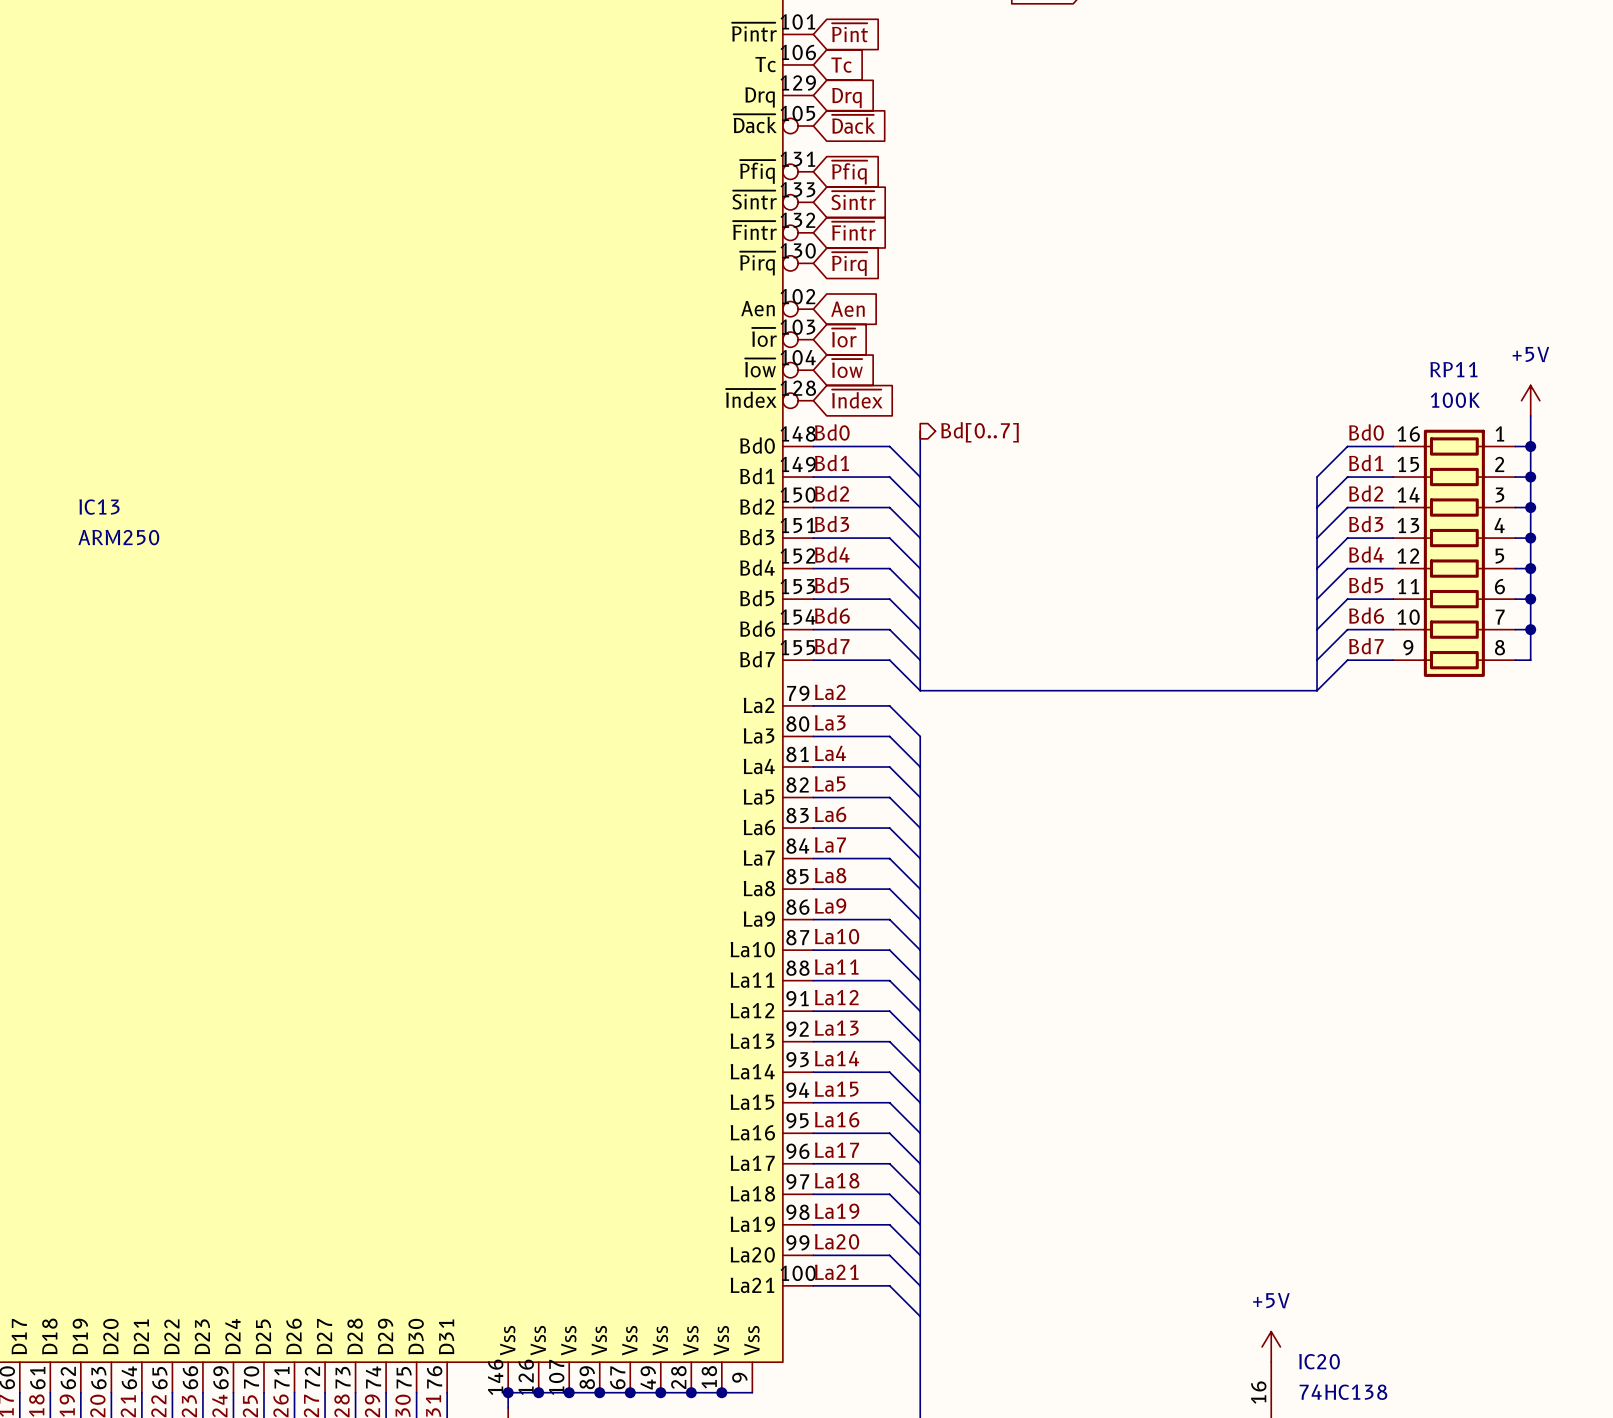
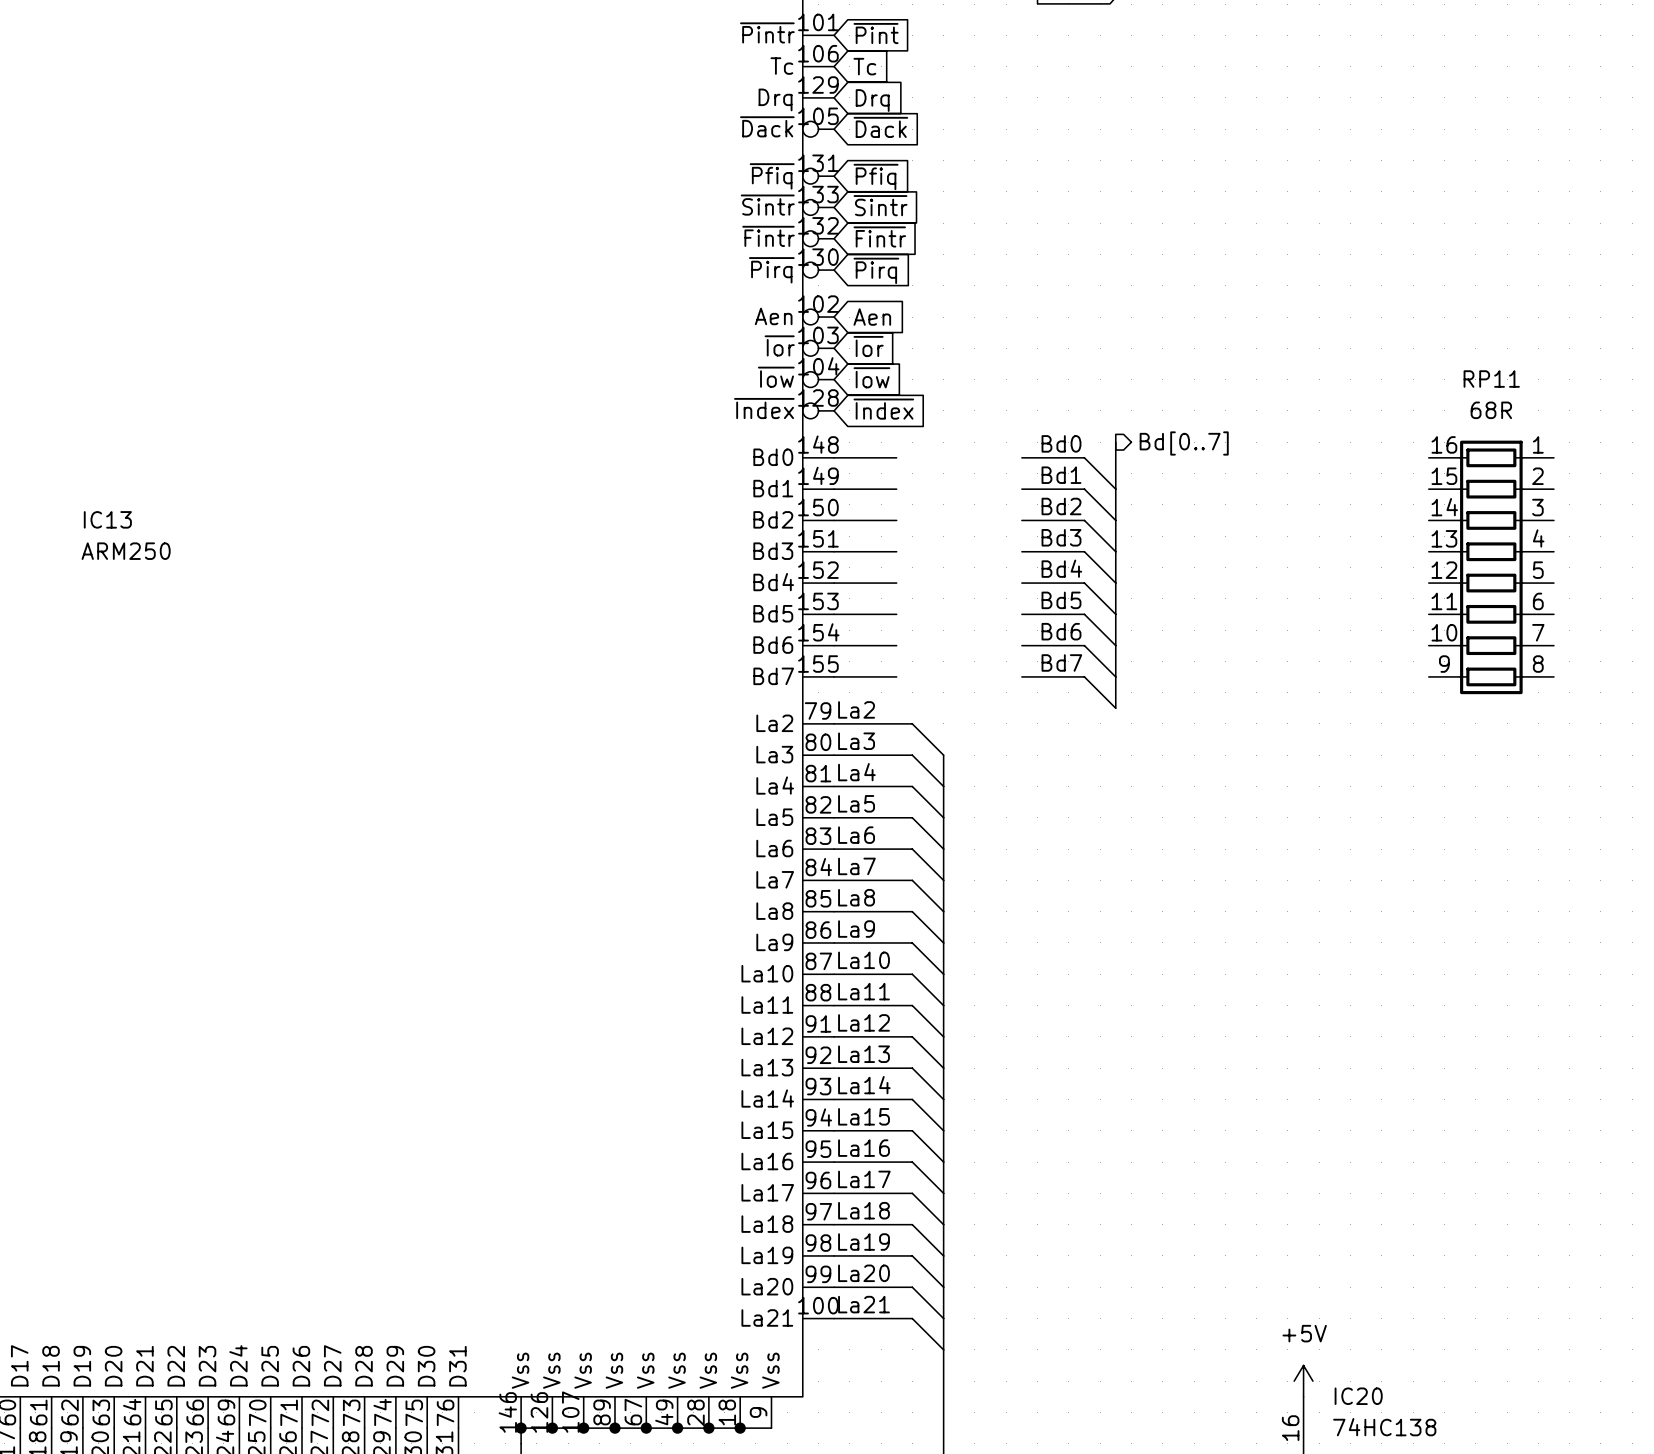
RP11 value: 100K (1455, 400) -> 68R (1491, 410)
power symbol: +5V (1530, 400) -> none
wire: (1530, 415) (1530, 660) (1515, 660) -> none
bus: (920, 431) (920, 690) (1317, 690) (1317, 477) -> none
bus: none -> (1115, 442) (1115, 708)
label: Bd0 (832, 432) -> none
hierarchical label position: Bd[0..7] (980, 432) -> Bd[0..7] (1184, 443)
label: none -> Bd0 (1061, 443)
label: Bd0 (1366, 432) -> none
wire: (874, 446) (889, 446) (920, 477) -> none
wire: none -> (1021, 457) (1084, 457) (1115, 489)
wire: (1393, 446) (1347, 446) (1317, 477) -> none
wire: (1515, 446) (1530, 446) -> none
junction: (1530, 446) -> none
label: Bd1 (832, 462) -> none
label: none -> Bd1 (1061, 475)
label: Bd1 (1366, 462) -> none
wire: (874, 477) (889, 477) (920, 507) -> none
wire: none -> (1021, 489) (1084, 489) (1115, 520)
wire: (1393, 477) (1347, 477) (1317, 507) -> none
wire: (1515, 477) (1530, 477) -> none
junction: (1530, 477) -> none
label: Bd2 (832, 493) -> none
label: none -> Bd2 (1061, 506)
label: Bd2 (1366, 493) -> none
wire: (874, 507) (889, 507) (920, 538) -> none
wire: none -> (1021, 520) (1084, 520) (1115, 551)
wire: (1393, 507) (1347, 507) (1317, 538) -> none
wire: (1515, 507) (1530, 507) -> none
junction: (1530, 507) -> none
label: Bd3 (832, 524) -> none
label: none -> Bd3 (1061, 537)
label: Bd3 (1366, 524) -> none
wire: (874, 538) (889, 538) (920, 568) -> none
wire: none -> (1021, 551) (1084, 551) (1115, 583)
wire: (1393, 538) (1347, 538) (1317, 568) -> none
wire: (1515, 538) (1530, 538) -> none
junction: (1530, 538) -> none
label: Bd4 (832, 554) -> none
label: none -> Bd4 (1061, 568)
label: Bd4 (1366, 554) -> none
wire: (874, 568) (889, 568) (920, 599) -> none
wire: none -> (1021, 583) (1084, 583) (1115, 614)
wire: (1393, 568) (1347, 568) (1317, 599) -> none
wire: (1515, 568) (1530, 568) -> none
junction: (1530, 568) -> none
label: Bd5 (832, 585) -> none
label: none -> Bd5 (1061, 600)
label: Bd5 (1366, 585) -> none
wire: (874, 599) (889, 599) (920, 629) -> none
wire: none -> (1021, 614) (1084, 614) (1115, 645)
wire: (1393, 599) (1347, 599) (1317, 629) -> none
wire: (1515, 599) (1530, 599) -> none
junction: (1530, 599) -> none
label: Bd6 (832, 615) -> none
label: none -> Bd6 (1061, 631)
label: Bd6 (1366, 615) -> none
wire: (874, 629) (889, 629) (920, 660) -> none
wire: none -> (1021, 645) (1084, 645) (1115, 676)
wire: (1393, 629) (1347, 629) (1317, 660) -> none
wire: (1515, 629) (1530, 629) -> none
junction: (1530, 629) -> none
label: Bd7 (832, 646) -> none
label: none -> Bd7 (1061, 662)
label: Bd7 (1366, 646) -> none
wire: (874, 660) (889, 660) (920, 690) -> none
wire: none -> (1021, 676) (1084, 676) (1115, 708)
wire: (1393, 660) (1347, 660) (1317, 690) -> none

